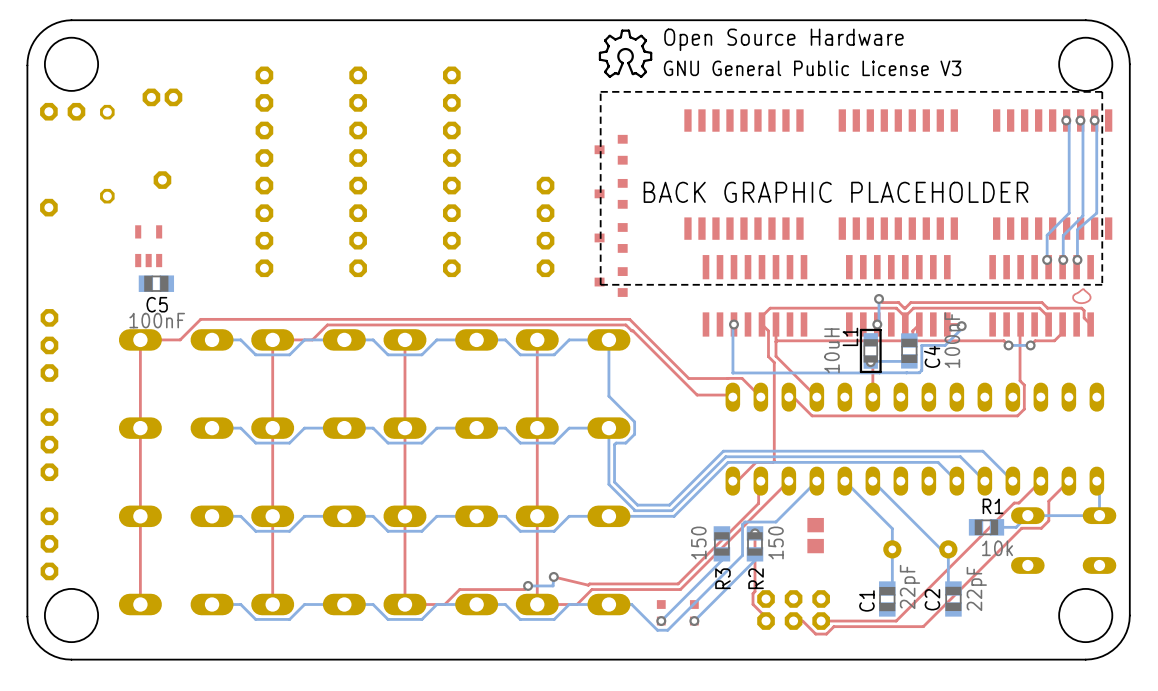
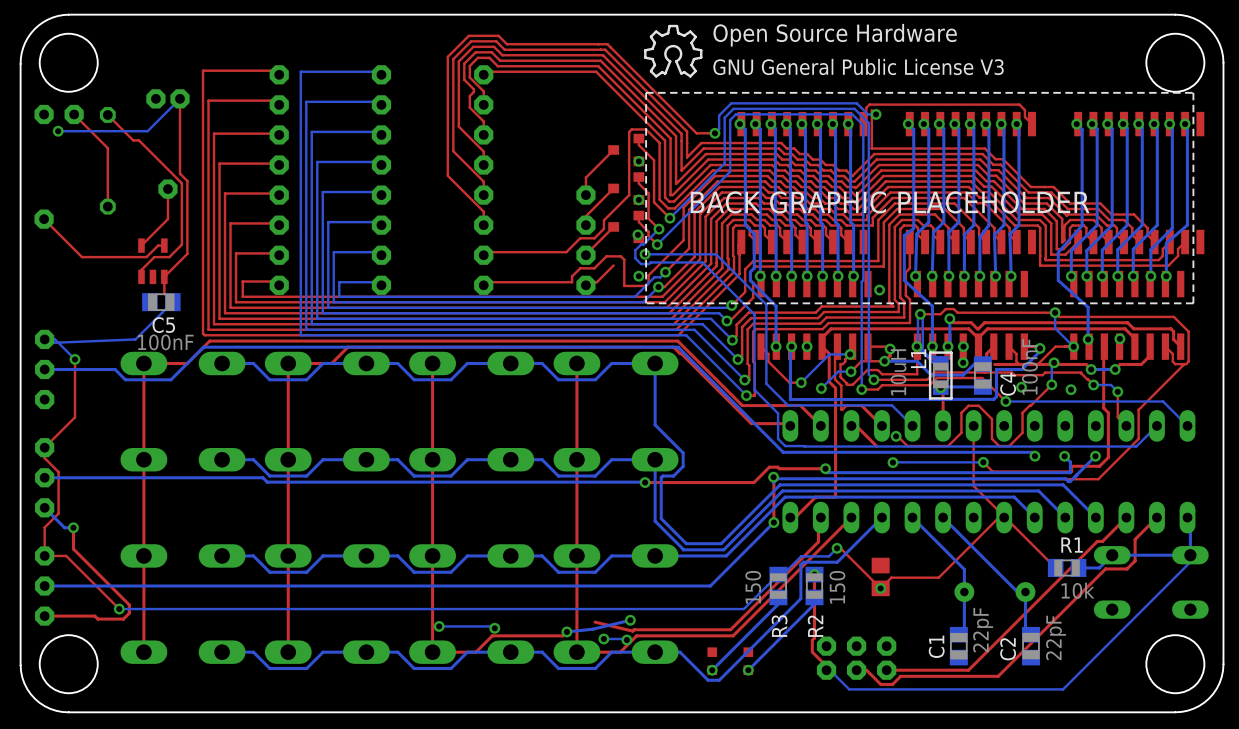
top track: none -> (279, 71) (203, 70) (203, 333) (204, 335) (678, 335) (739, 274) (738, 244) (741, 242)
bottom track: none -> (381, 71) (300, 71) (300, 335) (686, 335) (746, 395)
top track: none -> (483, 71) (596, 71) (665, 140) (665, 197) (669, 201) (674, 201) (710, 165) (772, 165) (777, 170) (785, 170) (790, 176) (798, 176) (803, 181) (811, 181) (816, 187) (824, 187) (829, 192) (837, 192) (842, 198) (850, 198) (855, 203) (883, 176) (973, 176) (984, 186) (991, 186) (1019, 214) (1042, 214) (1051, 223) (1051, 254) (1065, 254) (1078, 242)
bottom track: none -> (179, 98) (147, 131) (58, 131)
top track: none -> (179, 98) (179, 173) (187, 181) (187, 253) (164, 276) (164, 293) (172, 302)
top track: none -> (279, 101) (208, 100) (208, 329) (676, 329) (734, 271) (733, 228) (735, 225) (747, 225) (749, 228) (749, 235) (756, 242)
bottom track: none -> (381, 101) (306, 101) (306, 329) (694, 329) (744, 380)
top track: none -> (483, 101) (483, 91) (469, 77) (469, 65) (477, 57) (489, 57) (497, 66) (598, 66) (670, 138) (670, 195) (708, 159) (774, 159) (779, 165) (787, 165) (792, 170) (800, 170) (805, 176) (813, 176) (818, 181) (826, 181) (831, 187) (839, 187) (844, 192) (852, 192) (855, 195) (881, 170) (975, 170) (986, 181) (993, 181) (1021, 209) (1044, 209) (1056, 221) (1056, 249) (1063, 249) (1069, 242) (1069, 228) (1072, 225) (1083, 225) (1086, 228) (1086, 235) (1093, 242)
top track: none -> (871, 110) (871, 148)
top track: none -> (74, 114) (107, 148) (107, 206)
bottom track: none -> (876, 114) (867, 114) (856, 103) (731, 103) (719, 115) (719, 129) (714, 133)
via: none -> (876, 114)
top track: none -> (107, 114) (133, 140) (138, 140) (181, 183) (181, 244) (169, 257) (154, 257) (141, 269) (141, 276)
bottom track: none -> (739, 124) (745, 129) (745, 225) (754, 234) (754, 268) (750, 272) (750, 280) (776, 306) (776, 346)
via: none -> (739, 124)
bottom track: none -> (755, 124) (760, 129) (760, 276)
via: none -> (755, 124)
bottom track: none -> (770, 124) (775, 128) (776, 276)
via: none -> (770, 124)
bottom track: none -> (786, 124) (790, 128) (791, 276)
via: none -> (786, 124)
bottom track: none -> (801, 124) (805, 127) (807, 276)
via: none -> (801, 124)
bottom track: none -> (817, 124) (820, 127) (822, 276)
via: none -> (817, 124)
bottom track: none -> (832, 124) (835, 126) (835, 222) (838, 224) (838, 276)
via: none -> (832, 124)
bottom track: none -> (848, 124) (850, 126) (850, 222) (853, 225) (853, 276)
via: none -> (848, 124)
bottom track: none -> (908, 124) (913, 129) (913, 228) (904, 235) (904, 280) (932, 306) (932, 346)
via: none -> (908, 124)
bottom track: none -> (923, 124) (928, 129) (928, 222) (916, 234) (915, 276)
via: none -> (923, 124)
bottom track: none -> (939, 124) (943, 128) (943, 222) (933, 232) (932, 276)
via: none -> (939, 124)
bottom track: none -> (954, 124) (958, 128) (958, 222) (948, 232) (948, 276)
via: none -> (954, 124)
bottom track: none -> (970, 124) (973, 127) (973, 225) (964, 234) (964, 276)
via: none -> (970, 124)
bottom track: none -> (985, 124) (988, 127) (988, 225) (979, 237) (979, 276)
via: none -> (985, 124)
bottom track: none -> (1001, 124) (1003, 126) (1003, 225) (994, 234) (995, 276)
via: none -> (1001, 124)
bottom track: none -> (1016, 124) (1018, 126) (1018, 225) (1009, 234) (1011, 276)
via: none -> (1016, 124)
top track: none -> (1031, 124) (1024, 117) (1024, 110) (1019, 104) (869, 104) (866, 107) (866, 121) (863, 124)
bottom track: none -> (1076, 124) (1082, 129) (1082, 225) (1058, 252) (1058, 280) (1088, 307) (1088, 339)
via: none -> (1076, 124)
bottom track: none -> (1092, 124) (1097, 129) (1097, 225) (1071, 251) (1071, 276)
via: none -> (1092, 124)
bottom track: none -> (1107, 124) (1112, 128) (1112, 225) (1086, 250) (1086, 276)
via: none -> (1107, 124)
bottom track: none -> (1123, 124) (1127, 128) (1127, 225) (1102, 250) (1102, 276)
via: none -> (1123, 124)
bottom track: none -> (1138, 124) (1142, 127) (1142, 225) (1117, 249) (1117, 276)
via: none -> (1138, 124)
via: none -> (58, 131)
top track: none -> (279, 131) (277, 133) (214, 133) (214, 324) (673, 324) (728, 269) (727, 225) (733, 220) (749, 220) (754, 225) (762, 225) (764, 228) (764, 235) (771, 242)
bottom track: none -> (381, 131) (311, 131) (311, 324) (702, 324) (737, 359)
top track: none -> (483, 131) (483, 121) (469, 107) (469, 96) (473, 89) (464, 79) (464, 63) (475, 52) (491, 52) (500, 60) (600, 60) (676, 136) (676, 183) (706, 154) (776, 154) (782, 159) (789, 159) (795, 165) (802, 165) (808, 170) (815, 170) (821, 176) (828, 176) (834, 181) (841, 181) (847, 187) (855, 188) (878, 165) (978, 165) (988, 175) (996, 175) (1024, 203) (1046, 203) (1062, 218) (1062, 242) (1064, 240) (1064, 225) (1070, 220) (1093, 220) (1101, 228) (1101, 235) (1108, 242)
top track: none -> (714, 133) (696, 133) (607, 44) (506, 44) (498, 35) (468, 35) (447, 56) (447, 175) (483, 211) (483, 222)
via: none -> (714, 133)
top track: none -> (638, 138) (638, 145) (654, 160) (654, 202) (669, 218)
top track: none -> (871, 148) (984, 148) (995, 159) (1003, 159) (1030, 187) (1053, 187) (1070, 203) (1100, 203) (1111, 214) (1134, 214) (1147, 228) (1147, 235) (1154, 242)
top track: none -> (613, 149) (585, 177) (585, 192)
part: none -> (626, 149)
part: (611, 149) -> none
via: none -> (638, 161)
top track: none -> (279, 161) (277, 163) (219, 163) (219, 318) (671, 318) (722, 268) (722, 223) (731, 214) (751, 214) (757, 220) (764, 220) (770, 225) (777, 225) (780, 228) (780, 235) (787, 242)
bottom track: none -> (381, 161) (317, 161) (317, 318) (711, 318) (732, 340)
top track: none -> (483, 161) (483, 151) (458, 126) (458, 61) (473, 46) (494, 46) (502, 55) (602, 55) (681, 133) (681, 170) (703, 148) (779, 148) (784, 154) (792, 154) (797, 159) (805, 159) (810, 165) (818, 165) (823, 170) (831, 170) (836, 176) (844, 176) (849, 181) (854, 181) (876, 159) (980, 159) (991, 170) (998, 170) (1026, 198) (1049, 198) (1066, 215) (1095, 214) (1106, 225) (1114, 225) (1116, 228) (1116, 235) (1124, 242)
top track: none -> (638, 177) (638, 183) (648, 193) (648, 218) (659, 229)
top track: none -> (613, 188) (585, 216) (585, 222)
part: none -> (626, 188)
top track: none -> (167, 189) (167, 219) (141, 245)
top track: none -> (279, 192) (225, 193) (225, 313) (669, 313) (716, 265) (716, 221) (728, 209) (753, 209) (759, 214) (766, 214) (772, 220) (779, 220) (785, 225) (792, 225) (795, 228) (795, 235) (802, 242)
bottom track: none -> (381, 192) (322, 192) (322, 313) (719, 313) (726, 320)
top track: none -> (483, 192) (483, 181) (453, 151) (453, 59) (471, 41) (496, 41) (504, 49) (605, 49) (687, 131) (687, 157) (701, 143) (781, 143) (786, 148) (794, 148) (799, 154) (807, 154) (812, 159) (820, 159) (825, 165) (833, 165) (838, 170) (846, 170) (852, 176) (874, 154) (982, 154) (993, 164) (1000, 164) (1028, 192) (1051, 192) (1067, 209) (1098, 209) (1109, 220) (1124, 220) (1132, 228) (1132, 235) (1139, 242)
via: none -> (638, 199)
part: (611, 193) -> none
top track: none -> (638, 215) (638, 222) (657, 244)
bottom track: none -> (669, 218) (724, 163) (724, 117) (733, 108) (854, 108) (868, 123) (868, 374) (873, 379)
via: none -> (669, 218)
top track: none -> (44, 219) (82, 257) (146, 257) (158, 245) (164, 245)
top track: none -> (279, 222) (230, 223) (230, 307) (667, 307) (711, 263) (711, 218) (726, 203) (756, 203) (761, 209) (769, 209) (774, 214) (782, 214) (787, 220) (795, 220) (800, 225) (808, 225) (810, 228) (810, 235) (817, 242)
bottom track: none -> (381, 222) (328, 222) (328, 307) (729, 307) (731, 305)
top track: none -> (613, 226) (588, 252) (585, 252)
part: none -> (626, 226)
bottom track: none -> (659, 229) (635, 250) (635, 258) (641, 264) (702, 262) (754, 314) (754, 389) (778, 413) (778, 438) (785, 446) (1136, 446) (1156, 425)
via: none -> (659, 229)
via: none -> (637, 234)
top track: none -> (833, 242) (826, 235) (826, 228) (823, 225) (816, 225) (810, 220) (803, 220) (797, 214) (790, 214) (784, 209) (777, 209) (771, 203) (764, 203) (758, 198) (724, 198) (705, 216) (705, 261) (664, 302) (236, 302) (236, 253) (279, 252)
top track: none -> (848, 242) (841, 235) (841, 228) (838, 225) (831, 225) (825, 220) (818, 220) (812, 214) (805, 214) (799, 209) (792, 209) (786, 203) (779, 203) (773, 198) (766, 198) (760, 192) (721, 192) (700, 214) (700, 259) (662, 296) (242, 296) (242, 281) (279, 282)
top track: none -> (909, 242) (909, 268) (905, 272) (905, 295) (910, 299) (910, 323) (828, 323) (822, 329) (755, 329) (753, 331) (754, 395) (746, 395)
top track: none -> (925, 242) (918, 235) (918, 228) (915, 225) (904, 225) (900, 229) (900, 297) (904, 301) (904, 317) (826, 317) (820, 323) (753, 323) (747, 329) (749, 380) (744, 380)
top track: none -> (940, 242) (933, 235) (933, 228) (930, 225) (923, 225) (917, 220) (901, 220) (894, 226) (894, 299) (898, 303) (898, 312) (824, 312) (818, 318) (751, 318) (742, 327) (742, 359) (737, 359)
top track: none -> (955, 242) (948, 235) (948, 228) (935, 214) (899, 214) (889, 224) (889, 302) (893, 306) (821, 306) (815, 312) (748, 312) (736, 324) (736, 335) (732, 340)
top track: none -> (970, 242) (963, 235) (963, 228) (944, 209) (897, 209) (883, 222) (883, 266)
top track: none -> (986, 242) (979, 235) (979, 228) (954, 203) (894, 203) (878, 220) (878, 261) (753, 261) (745, 269) (745, 292) (731, 305)
top track: none -> (1001, 242) (994, 235) (994, 228) (964, 198) (892, 198) (872, 217) (872, 225) (846, 225) (841, 220) (833, 220) (828, 214) (820, 214) (815, 209) (807, 209) (802, 203) (794, 203) (789, 198) (781, 198) (776, 192) (768, 192) (763, 187) (719, 187) (694, 212) (694, 256) (664, 287) (658, 287)
top track: none -> (1016, 242) (1009, 235) (1009, 228) (984, 203) (977, 203) (966, 192) (890, 192) (867, 215) (867, 220) (848, 220) (843, 214) (835, 214) (830, 209) (822, 209) (817, 203) (809, 203) (804, 198) (796, 198) (791, 192) (783, 192) (778, 187) (770, 187) (765, 181) (717, 181) (689, 209) (689, 248) (665, 272)
top track: none -> (1169, 242) (1162, 249) (1162, 256) (1158, 260) (1045, 260) (1045, 225) (1040, 220) (1017, 220) (989, 192) (981, 192) (971, 181) (885, 181) (858, 209) (853, 209) (847, 203) (840, 203) (834, 198) (827, 198) (821, 192) (814, 192) (808, 187) (801, 187) (795, 181) (788, 181) (782, 176) (775, 176) (769, 170) (712, 170) (674, 208) (668, 208) (659, 199) (659, 142) (646, 129) (631, 129) (629, 131) (629, 195) (603, 220) (603, 228) (594, 238) (580, 238) (566, 252) (483, 252)
top track: none -> (1185, 242) (1178, 249) (1178, 256) (1168, 265) (1040, 265) (1040, 256)
bottom track: none -> (657, 244) (730, 171) (730, 120) (735, 114) (852, 114) (863, 125) (861, 389)
via: none -> (657, 244)
bottom track: none -> (381, 252) (333, 252) (333, 302) (643, 302) (658, 287)
part: (611, 237) -> none
bottom track: none -> (645, 254) (716, 254) (766, 304) (766, 383) (788, 405) (892, 405) (912, 425)
via: none -> (645, 254)
top track: none -> (1040, 256) (1040, 228) (1037, 225) (1014, 225) (987, 197) (979, 197) (968, 187) (888, 187) (861, 214) (851, 214) (845, 209) (838, 209) (832, 203) (825, 203) (819, 198) (812, 198) (806, 192) (799, 192) (793, 187) (786, 187) (780, 181) (773, 181) (767, 176) (715, 176) (683, 207) (683, 240) (648, 275) (648, 283) (646, 285) (624, 285) (624, 259) (620, 256) (606, 256) (594, 268) (580, 268) (572, 276) (572, 282) (483, 282)
top track: none -> (613, 265) (596, 282) (585, 282)
top track: none -> (883, 266) (755, 266) (750, 271) (753, 297) (730, 320) (726, 320)
bottom track: none -> (665, 272) (660, 277) (654, 277) (634, 296) (339, 296) (339, 282) (381, 282)
via: none -> (665, 272)
via: none -> (638, 276)
via: none -> (760, 276)
via: none -> (776, 276)
via: none -> (791, 276)
via: none -> (807, 276)
via: none -> (822, 276)
via: none -> (838, 276)
via: none -> (853, 276)
via: none -> (915, 276)
via: none -> (932, 276)
via: none -> (948, 276)
via: none -> (964, 276)
via: none -> (979, 276)
via: none -> (995, 276)
via: none -> (1011, 276)
via: none -> (1071, 276)
via: none -> (1086, 276)
via: none -> (1102, 276)
via: none -> (1117, 276)
via: none -> (658, 287)
via: none -> (879, 290)
part: (611, 282) -> none
bottom track: none -> (172, 302) (135, 339) (46, 343) (55, 339) (75, 359)
via: none -> (731, 305)
top zone outline: (1083, 288) (1090, 295) (1089, 299) (1083, 303) (1075, 301) (1073, 295) (1083, 288) -> none
bottom track: none -> (1055, 312) (1055, 328) (1073, 346)
via: none -> (1055, 312)
top track: none -> (920, 314) (940, 314) (945, 309) (953, 309) (957, 312) (1055, 312) (1059, 316) (1173, 316) (1188, 331) (1188, 361) (1186, 364) (1175, 364) (1172, 361) (1172, 354) (1165, 346)
via: none -> (920, 314)
via: none -> (726, 320)
via: none -> (1088, 339)
via: none -> (1119, 338)
via: none -> (732, 340)
top track: none -> (761, 346) (768, 354) (768, 361) (789, 382) (801, 382)
via: none -> (776, 346)
via: none -> (807, 346)
top track: none -> (867, 346) (887, 346) (890, 349) (890, 355) (884, 361) (861, 361) (851, 371)
via: none -> (916, 346)
top track: none -> (917, 346) (917, 374) (882, 374) (877, 370) (867, 370) (852, 384) (846, 384) (840, 377) (840, 364) (845, 361) (852, 351) (852, 346)
via: none -> (932, 346)
via: none -> (963, 346)
top track: none -> (1073, 346) (1055, 346) (1038, 364) (1018, 364) (1016, 361) (1016, 354) (1009, 346)
via: none -> (1073, 346)
via: none -> (890, 349)
bottom track: none -> (850, 354) (829, 354) (801, 382)
via: none -> (850, 354)
top track: (776, 334) (776, 356) (798, 378) -> (837, 357) (835, 359) (835, 379) (841, 385) (841, 409) (846, 405) (861, 405)
top track: none -> (75, 359) (75, 417) (44, 447) (44, 458) (58, 472) (58, 513) (44, 527) (44, 555) (66, 555) (119, 609)
via: none -> (75, 359)
via: none -> (737, 359)
bottom track: none -> (978, 359) (963, 375) (931, 375) (917, 361) (884, 361)
via: none -> (884, 361)
bottom track: none -> (940, 363) (933, 356) (928, 356) (922, 350) (922, 316) (920, 314) (917, 315) (916, 346) (933, 363)
via: none -> (963, 362)
bottom track: none -> (1054, 362) (1051, 365) (1051, 384)
via: none -> (1054, 362)
top track: (920, 340) (776, 341) -> none
top track: none -> (1184, 364) (1138, 409) (1138, 438) (1098, 479) (973, 480)
bottom track: none -> (44, 369) (115, 369) (125, 379) (170, 379) (203, 347) (678, 347) (783, 452) (1034, 452) (1034, 456)
bottom track: none -> (851, 371) (838, 371) (821, 388)
via: none -> (851, 371)
top track: none -> (873, 379) (927, 379) (934, 372) (1011, 372) (1014, 375) (1080, 372) (1093, 384)
via: none -> (873, 379)
via: none -> (744, 380)
via: none -> (801, 382)
top track: none -> (1051, 384) (1022, 412) (1022, 432) (1009, 446) (999, 446) (991, 438) (991, 419) (978, 405) (968, 405) (961, 412) (961, 432) (948, 446) (907, 446) (896, 436)
via: none -> (1051, 384)
bottom track: none -> (1093, 384) (1110, 384) (1117, 391)
via: none -> (1093, 384)
via: none -> (1021, 387)
via: none -> (821, 388)
top track: none -> (861, 389) (877, 389) (882, 385) (929, 385) (936, 378) (982, 378) (1005, 401)
via: none -> (861, 389)
via: none -> (1071, 389)
top track: none -> (1117, 391) (1117, 417) (1126, 425)
via: none -> (1117, 391)
via: none -> (746, 395)
bottom track: none -> (1005, 401) (1163, 401) (1187, 425)
via: none -> (1005, 401)
top track: none -> (973, 425) (973, 485) (1055, 567)
via: none -> (896, 436)
top track: (1024, 409) (1017, 415) (812, 415) -> (1108, 439) (1108, 457) (1099, 466) (1071, 466) (1071, 471) (992, 471) (983, 462)
via: none -> (1034, 456)
bottom track: none -> (1064, 456) (1070, 462) (1070, 472) (826, 472) (825, 468)
via: none -> (1064, 456)
bottom track: none -> (1095, 456) (1070, 481) (1065, 478) (777, 478) (773, 482) (773, 477)
via: none -> (1095, 456)
via: none -> (892, 462)
bottom track: none -> (983, 462) (892, 462)
via: none -> (983, 462)
top track: none -> (825, 468) (769, 467) (754, 482) (645, 482)
via: none -> (825, 468)
bottom track: none -> (44, 477) (262, 477) (267, 482) (645, 482)
top track: none -> (773, 477) (773, 522)
via: none -> (773, 477)
via: none -> (645, 482)
bottom track: none -> (44, 507) (64, 527) (73, 527)
top track: none -> (1005, 517) (998, 517) (938, 577) (891, 577) (880, 588)
bottom track: none -> (773, 522) (710, 586) (44, 586)
via: none -> (773, 522)
top track: none -> (73, 527) (73, 549) (129, 604) (129, 613) (123, 619) (97, 619) (94, 616) (44, 616)
via: none -> (73, 527)
bottom track: none -> (837, 548) (828, 556) (801, 556) (782, 574) (778, 574) (743, 609) (119, 609)
via: none -> (837, 548)
top track: none -> (840, 548) (886, 594)
bottom track: none -> (1190, 555) (1192, 559) (1063, 689) (849, 689) (833, 674) (826, 670)
via: none -> (880, 588)
via: none -> (119, 609)
via: none -> (630, 620)
bottom track: (553, 576) (553, 585) (528, 585) -> (630, 620) (592, 629) (566, 631)
via: (553, 576) -> none
bottom track: none -> (439, 626) (492, 626) (494, 628)
via: none -> (439, 626)
via: none -> (494, 628)
bottom track: none -> (603, 638) (626, 640)
via: none -> (603, 638)
via: none -> (626, 640)

